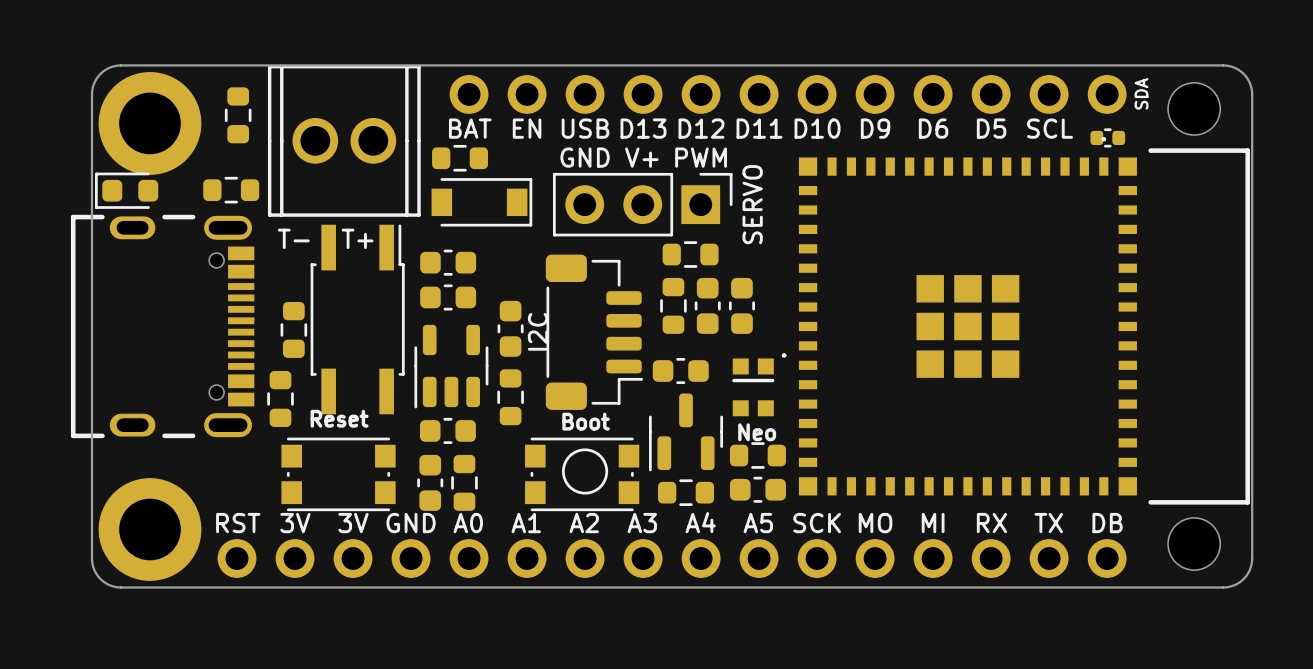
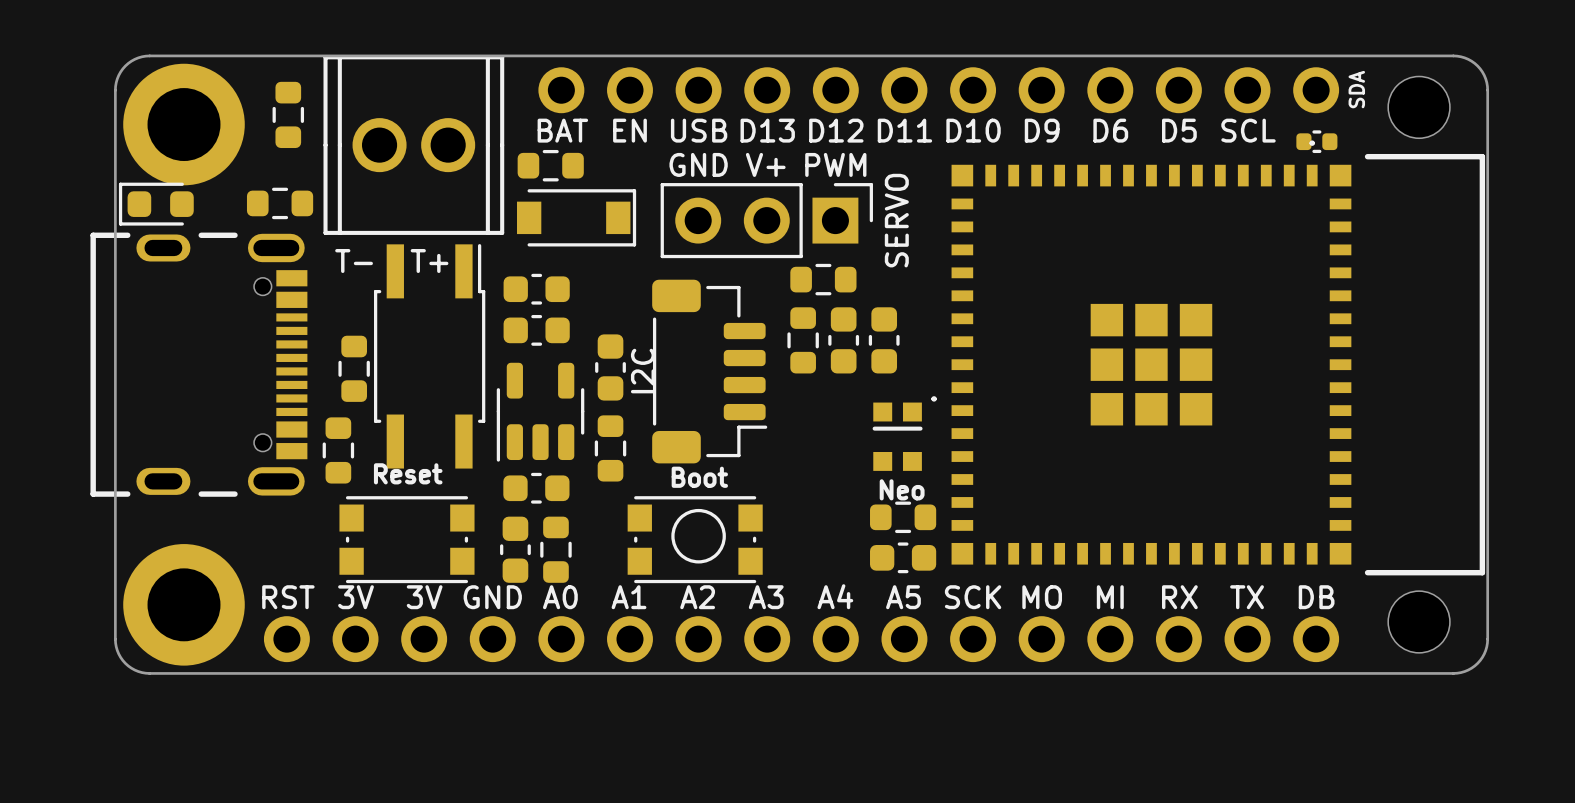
part: (680, 371) -> none
part: (686, 432) -> none
part: (686, 492) -> none

